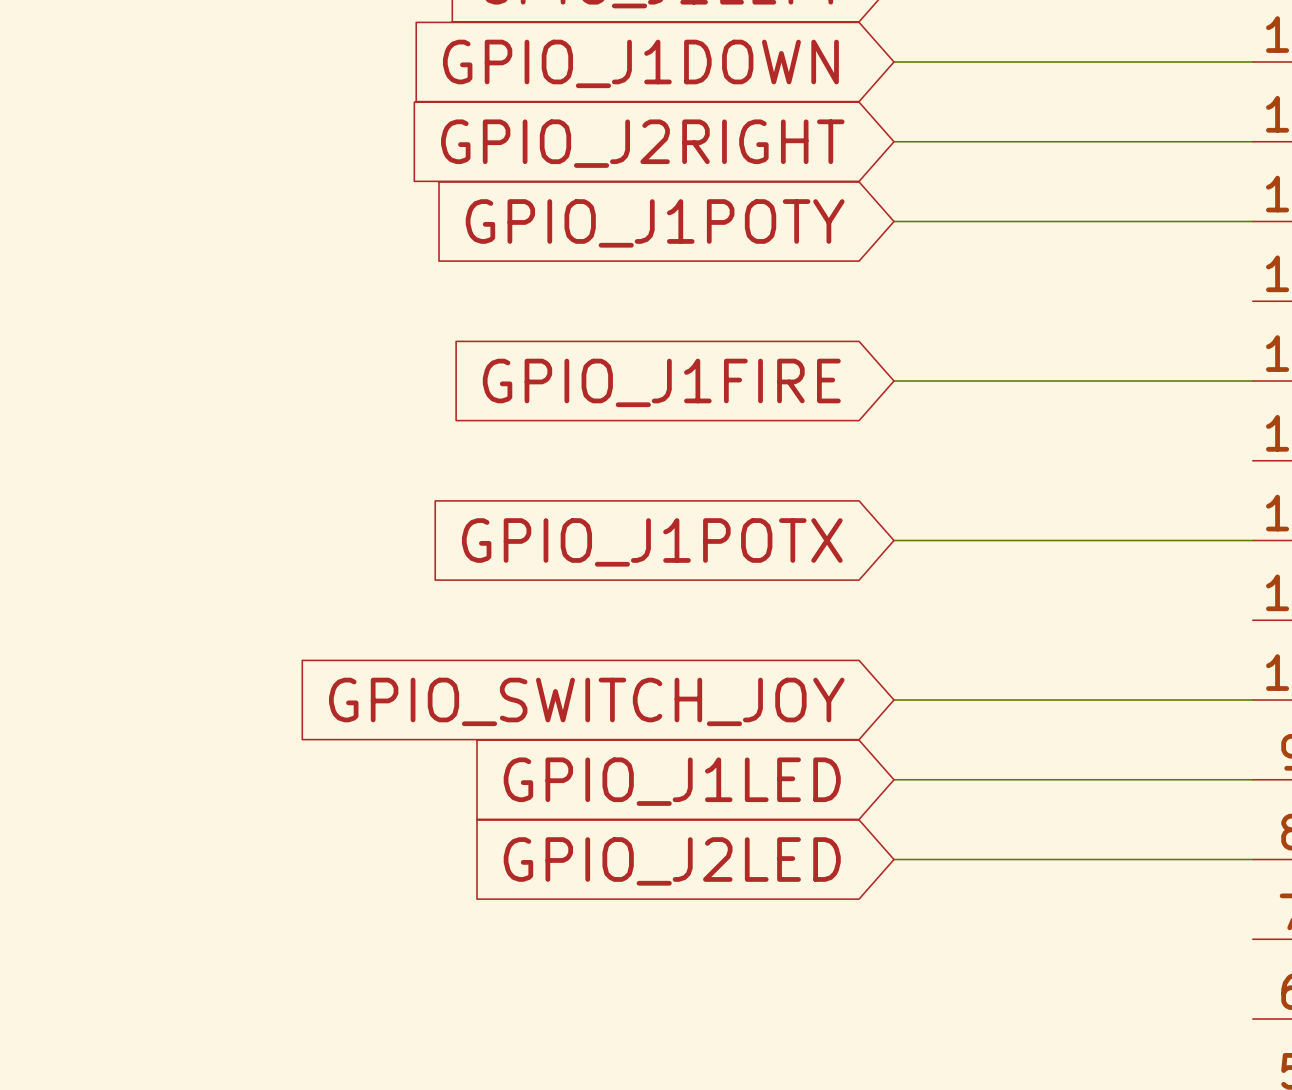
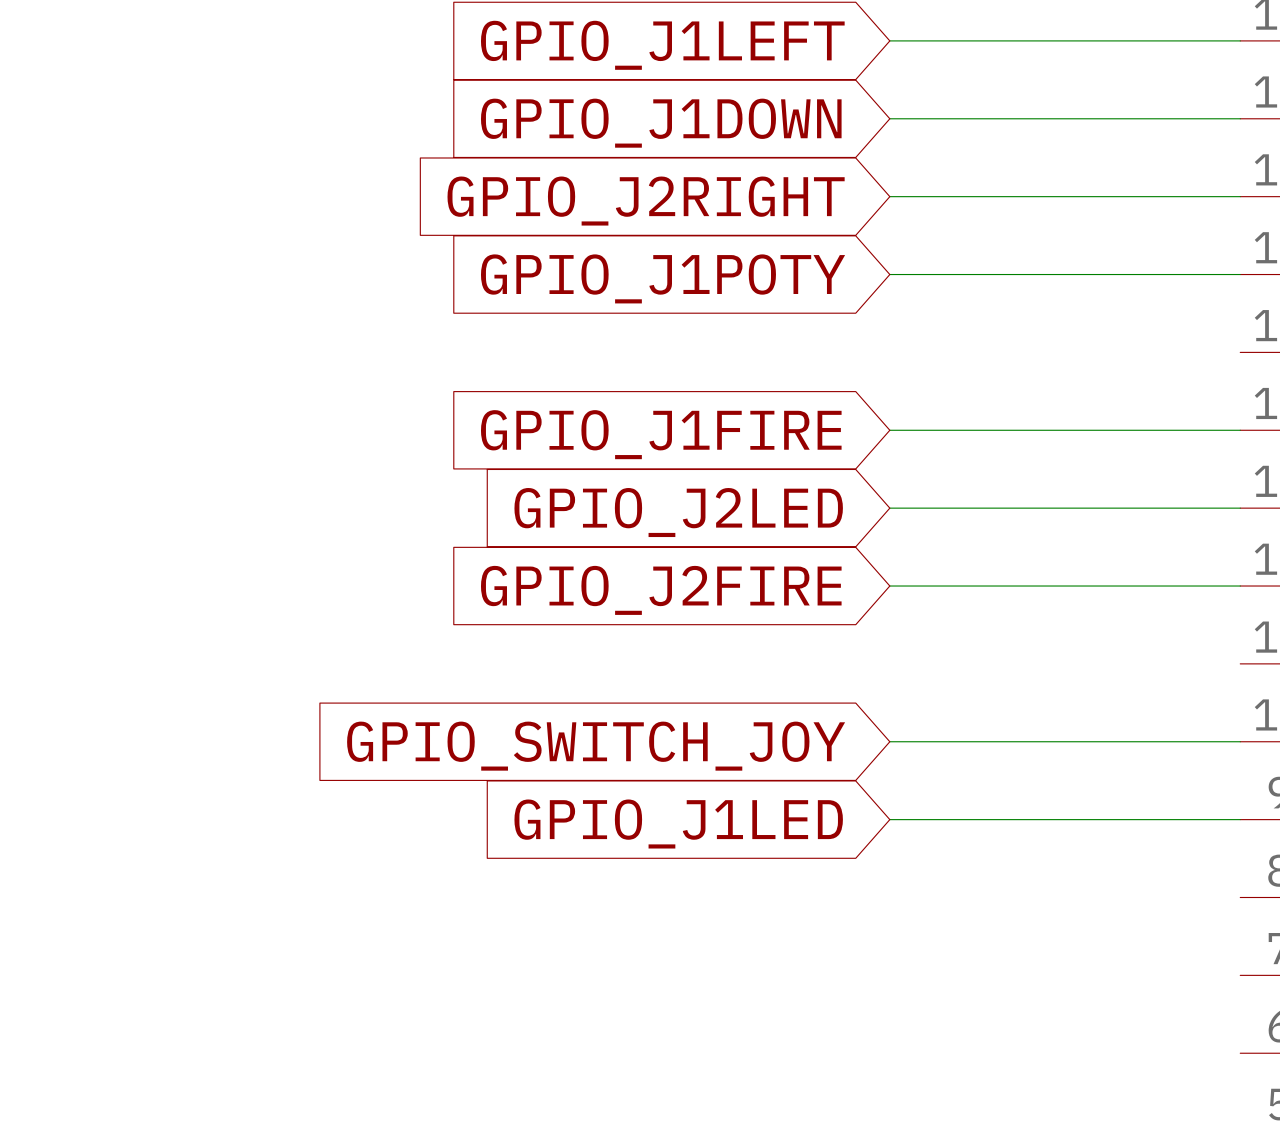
global label: GPIO_J1POTX (652, 542) -> GPIO_J2FIRE (661, 590)
wire: (893, 859) (1252, 859) -> (889, 508) (1240, 508)
global label position: GPIO_J2LED (672, 861) -> GPIO_J2LED (678, 512)

